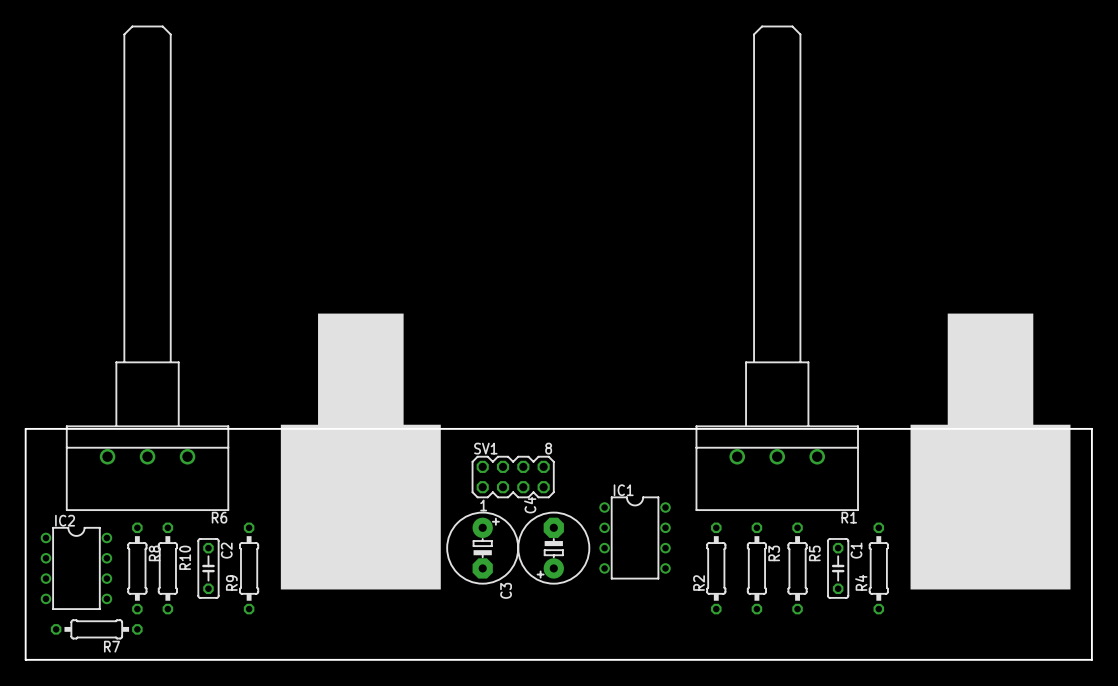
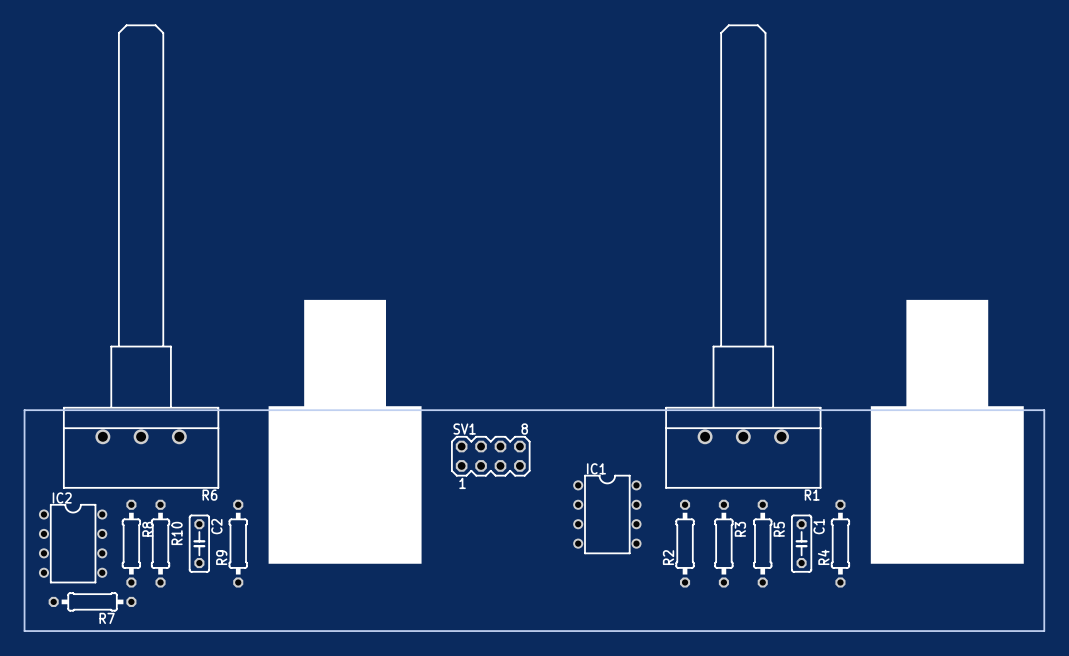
C3: (482, 548) -> none
C4: (553, 548) -> none

